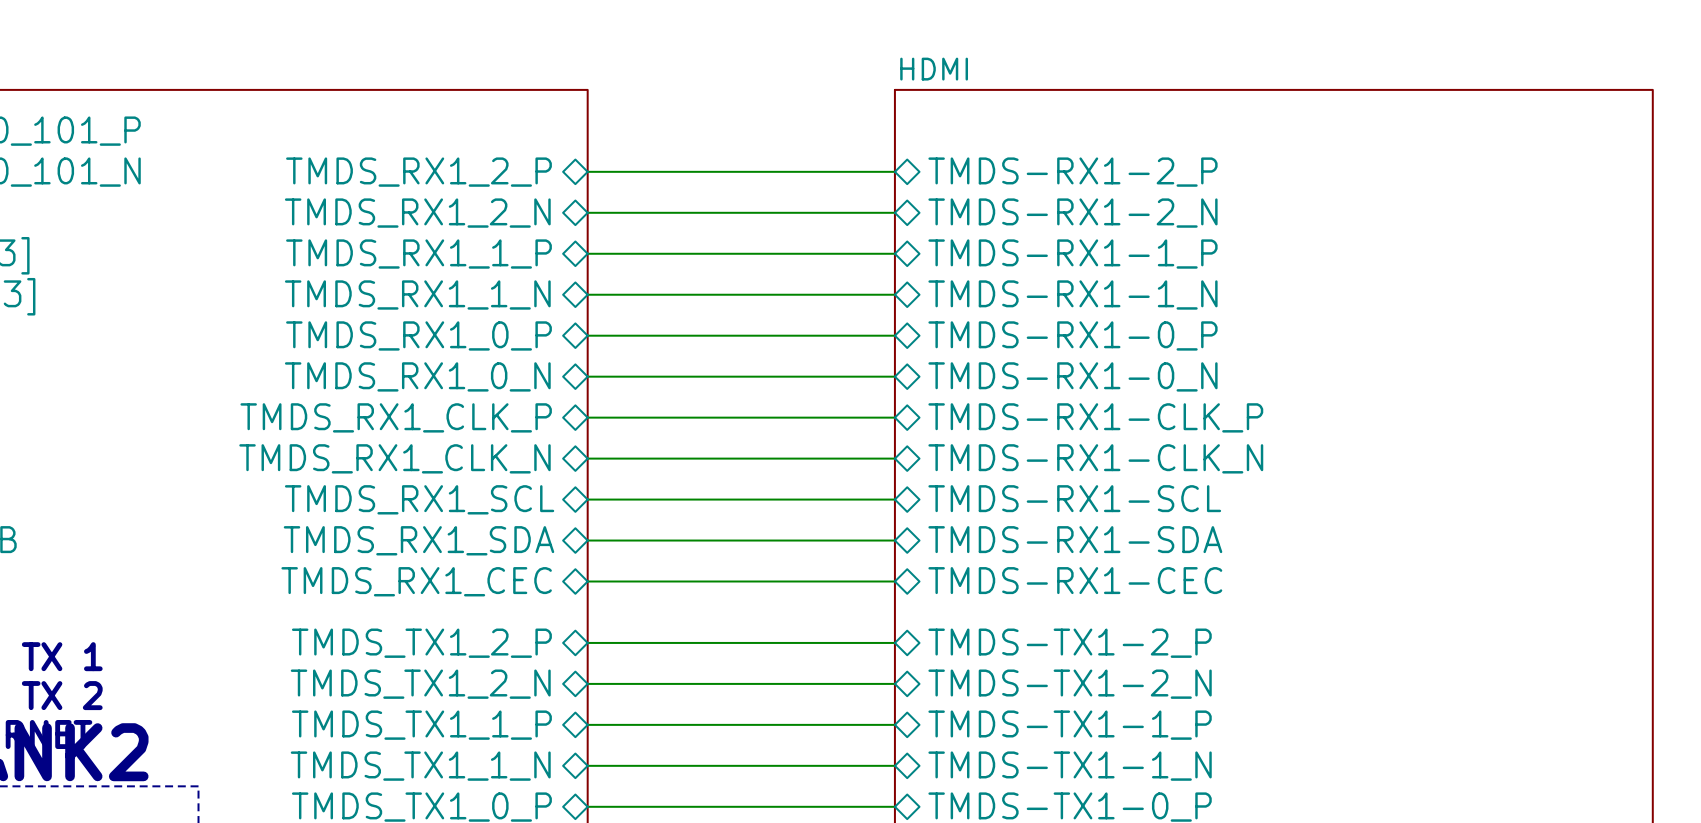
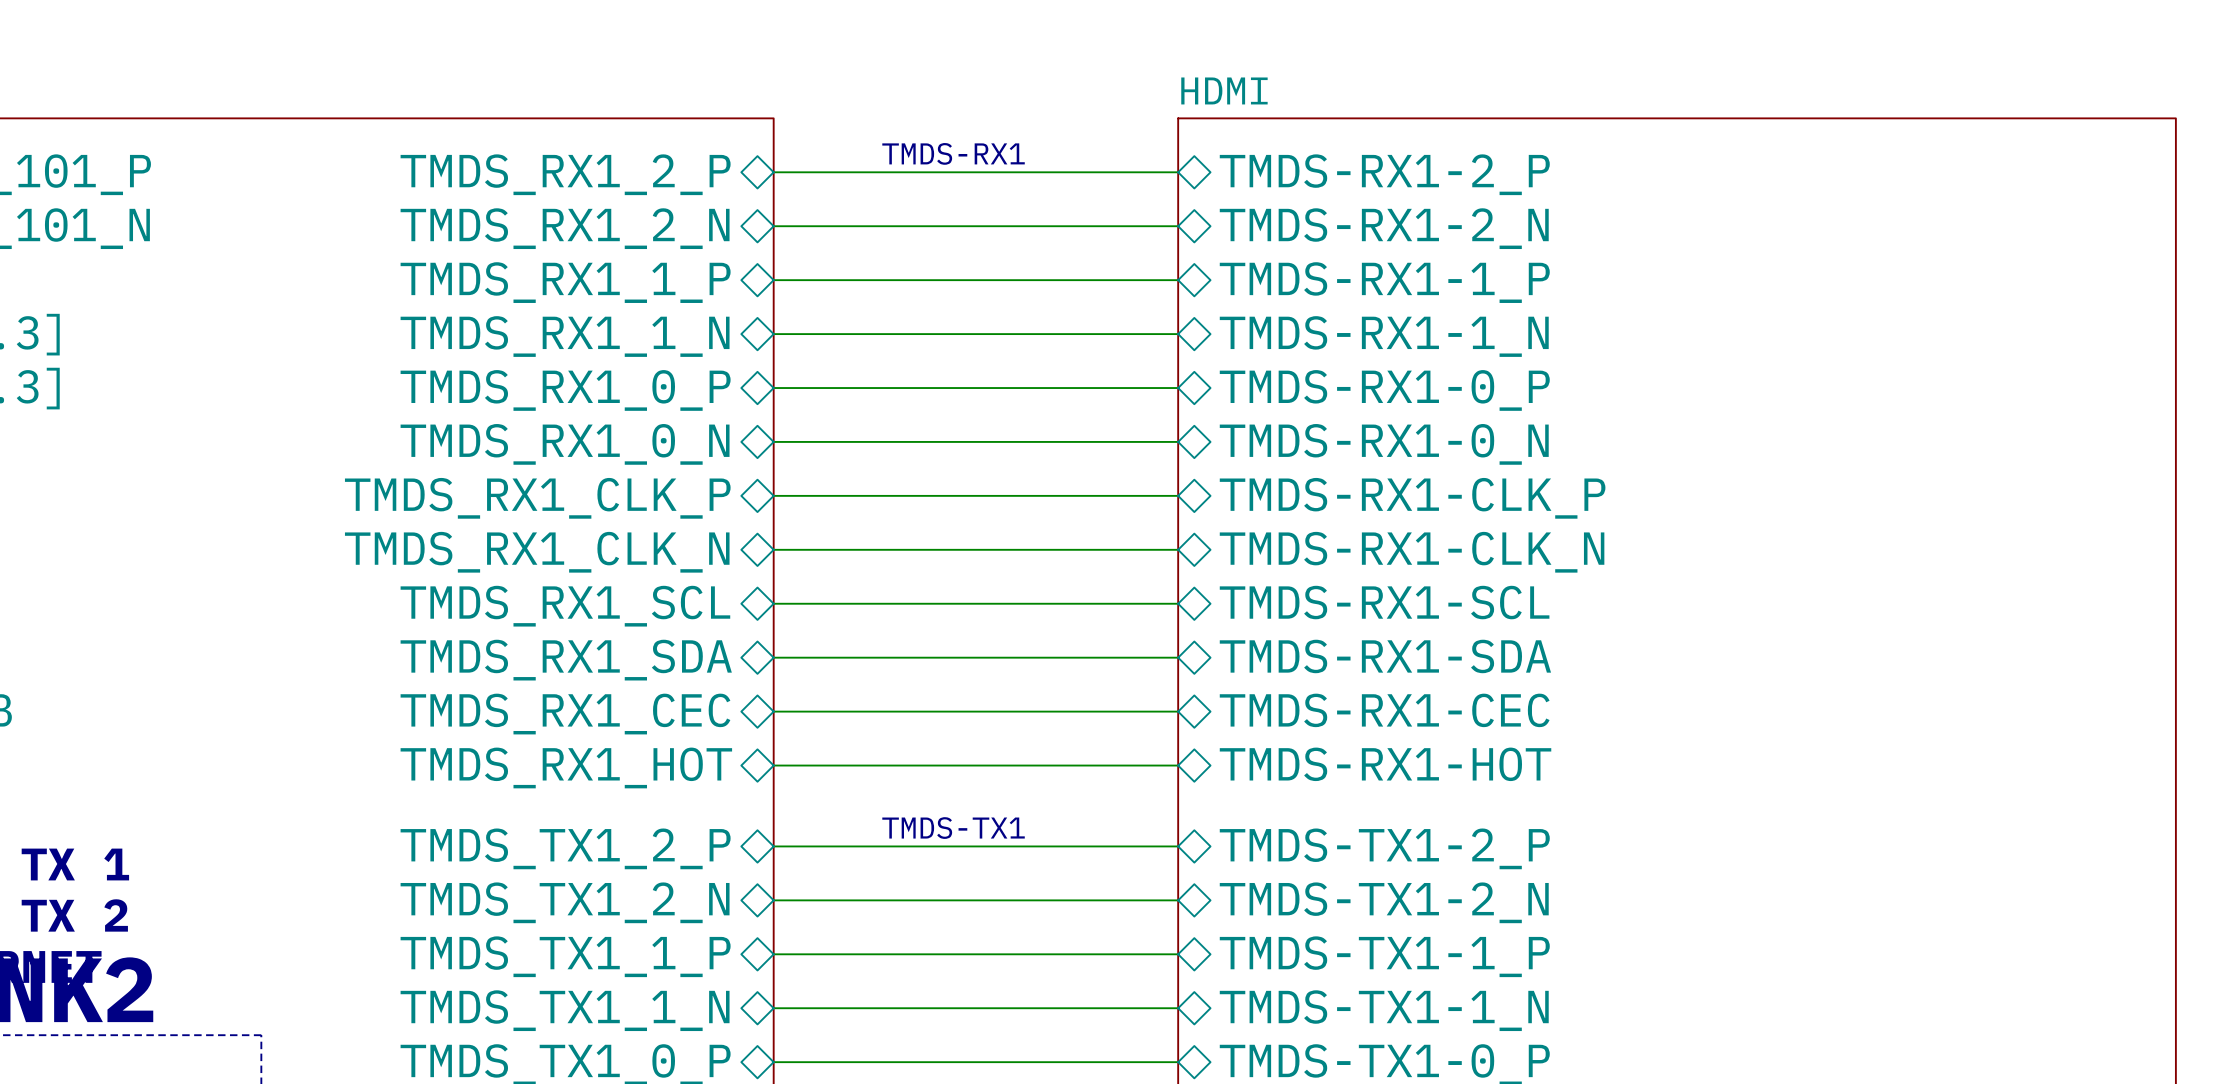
text: none -> TMDS-RX1 (953, 153)
wire: none -> (773, 172) (1178, 172)
sheet pin: none -> TMDS_RX1_2_P (565, 174)
sheet pin: none -> TMDS-RX1-2_P (1384, 174)
sheet pin: TMDS_RX1_2_P (418, 172) -> TMDS_RX1_2_N (565, 228)
sheet pin: TMDS-RX1-2_P (1072, 172) -> TMDS-RX1-2_N (1384, 228)
sheet pin: TMDS_RX1_2_N (417, 213) -> TMDS_RX1_1_P (565, 282)
sheet pin: TMDS-RX1-2_N (1072, 213) -> TMDS-RX1-1_P (1384, 282)
sheet pin: TMDS_RX1_1_P (418, 254) -> TMDS_RX1_1_N (565, 336)
sheet pin: TMDS-RX1-1_P (1072, 254) -> TMDS-RX1-1_N (1384, 336)
sheet pin: TMDS_RX1_1_N (417, 294) -> TMDS_RX1_0_P (565, 390)
sheet pin: TMDS-RX1-1_N (1072, 294) -> TMDS-RX1-0_P (1384, 390)
sheet pin: TMDS_RX1_0_P (418, 335) -> TMDS_RX1_0_N (565, 444)
sheet pin: TMDS-RX1-0_P (1072, 335) -> TMDS-RX1-0_N (1384, 444)
sheet pin: TMDS_RX1_0_N (417, 376) -> TMDS_RX1_CLK_P (537, 498)
sheet pin: TMDS-RX1-0_N (1072, 376) -> TMDS-RX1-CLK_P (1412, 498)
sheet pin: TMDS_RX1_CLK_P (396, 417) -> TMDS_RX1_CLK_N (537, 552)
sheet pin: TMDS-RX1-CLK_P (1095, 417) -> TMDS-RX1-CLK_N (1412, 552)
sheet pin: TMDS_RX1_CLK_N (394, 458) -> TMDS_RX1_SCL (565, 606)
sheet pin: TMDS-RX1-CLK_N (1095, 458) -> TMDS-RX1-SCL (1384, 602)
sheet pin: TMDS-RX1-SCL (1074, 498) -> TMDS-RX1-SDA (1385, 656)
sheet pin: TMDS_RX1_SCL (419, 499) -> TMDS_RX1_SDA (566, 660)
sheet pin: TMDS-RX1-SDA (1075, 539) -> TMDS-RX1-CEC (1384, 710)
sheet pin: TMDS_RX1_SDA (418, 540) -> TMDS_RX1_CEC (565, 714)
sheet pin: TMDS-RX1-CEC (1075, 580) -> TMDS-RX1-HOT (1385, 764)
sheet pin: TMDS_RX1_CEC (416, 581) -> TMDS_RX1_HOT (566, 767)
text: none -> TMDS-TX1 (953, 828)

